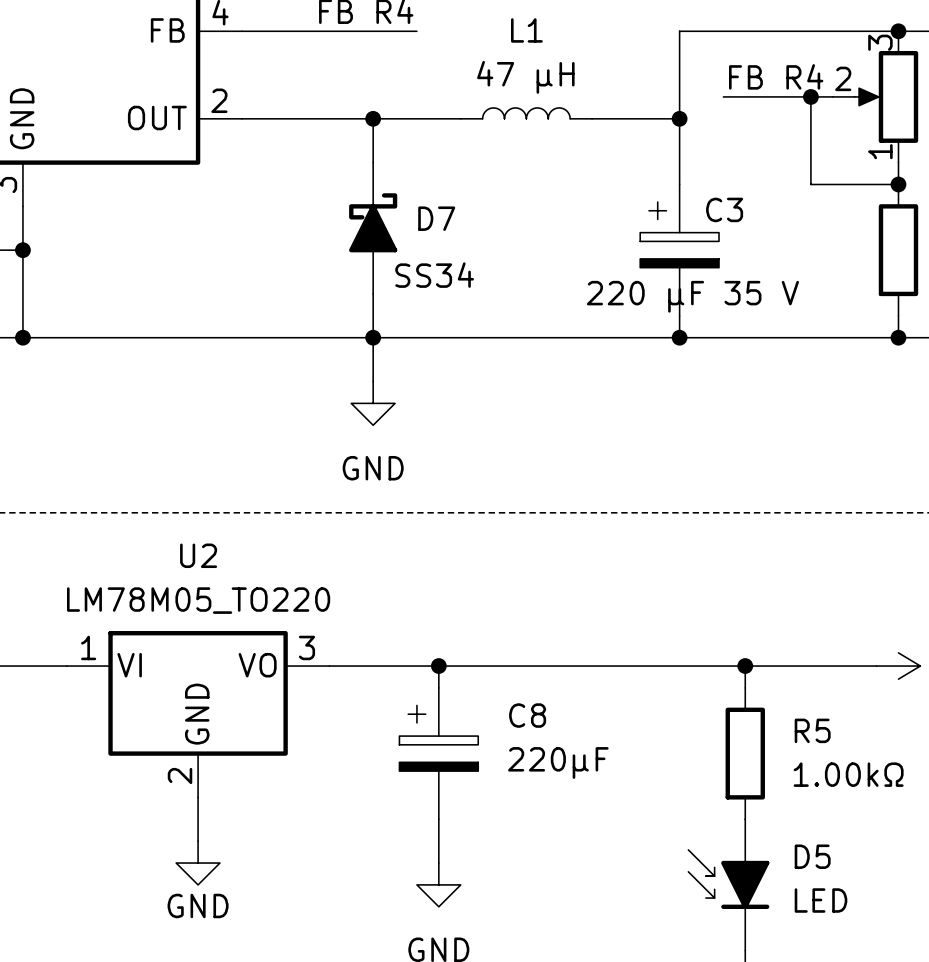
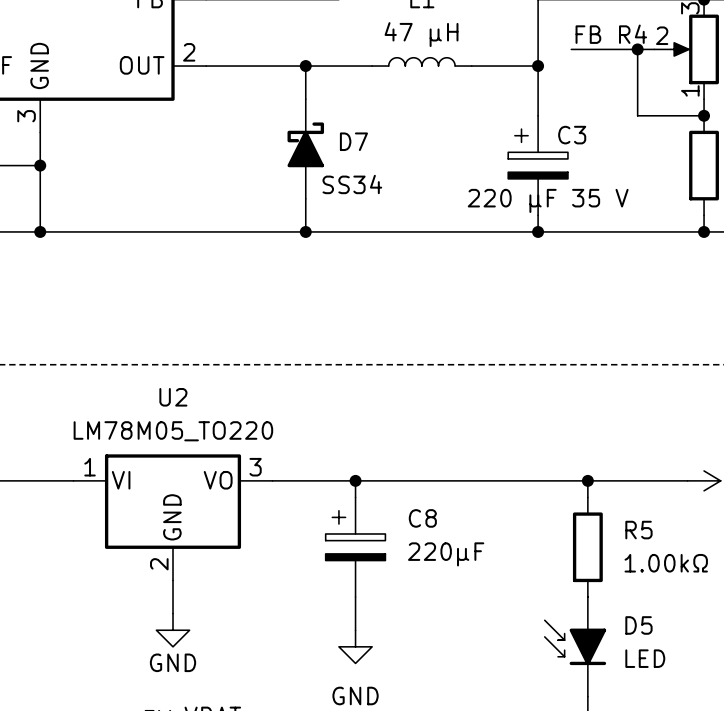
wire: (373, 337) (373, 381) -> none
power symbol: GND (373, 403) -> none

